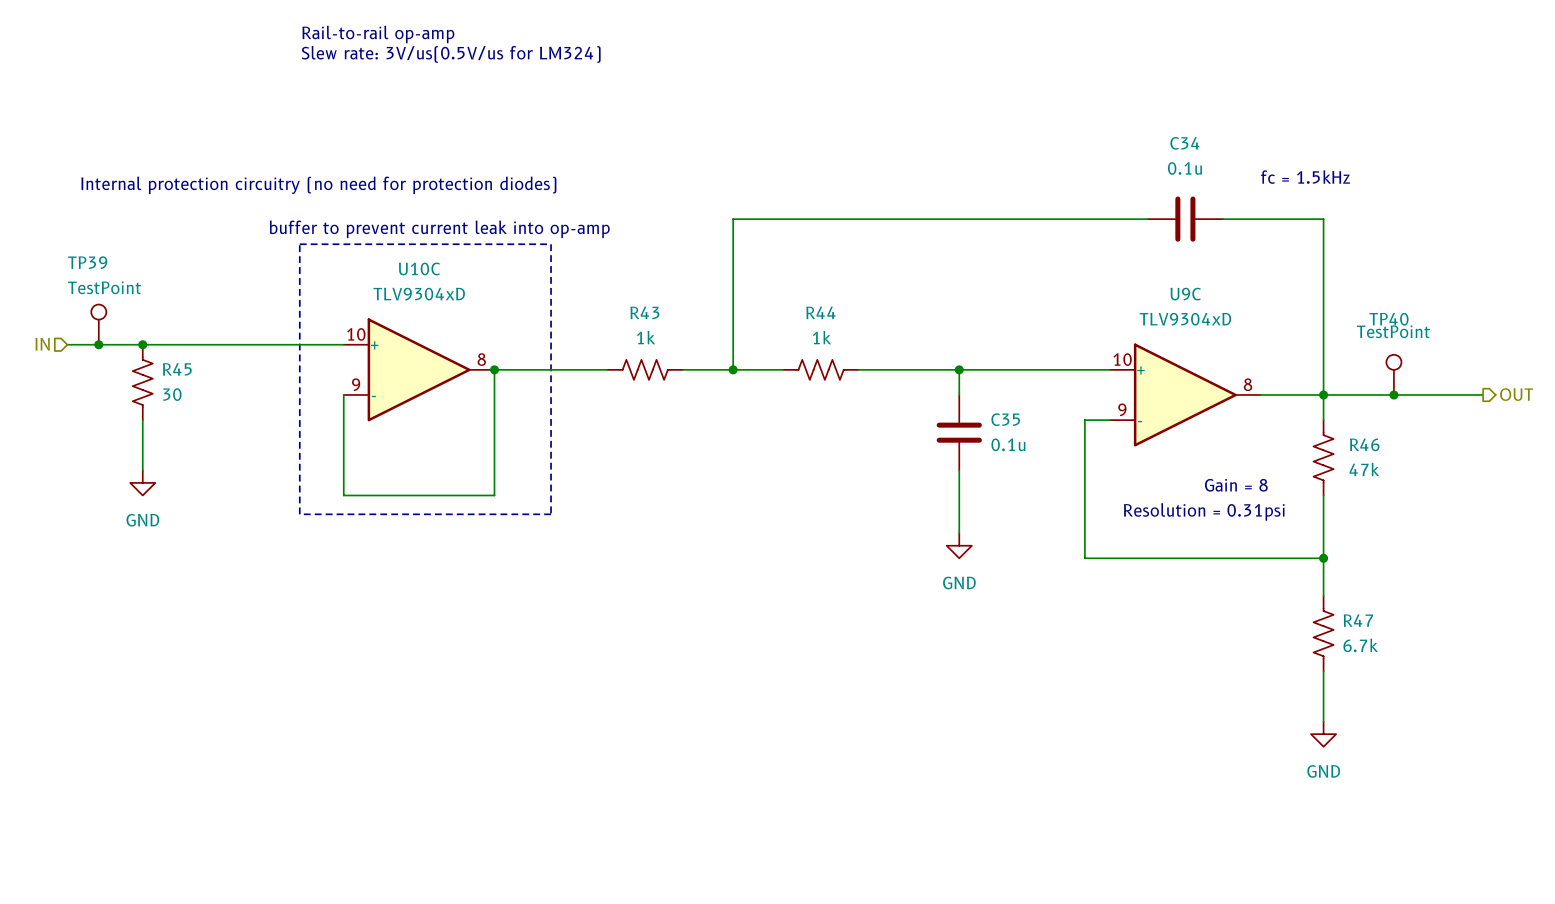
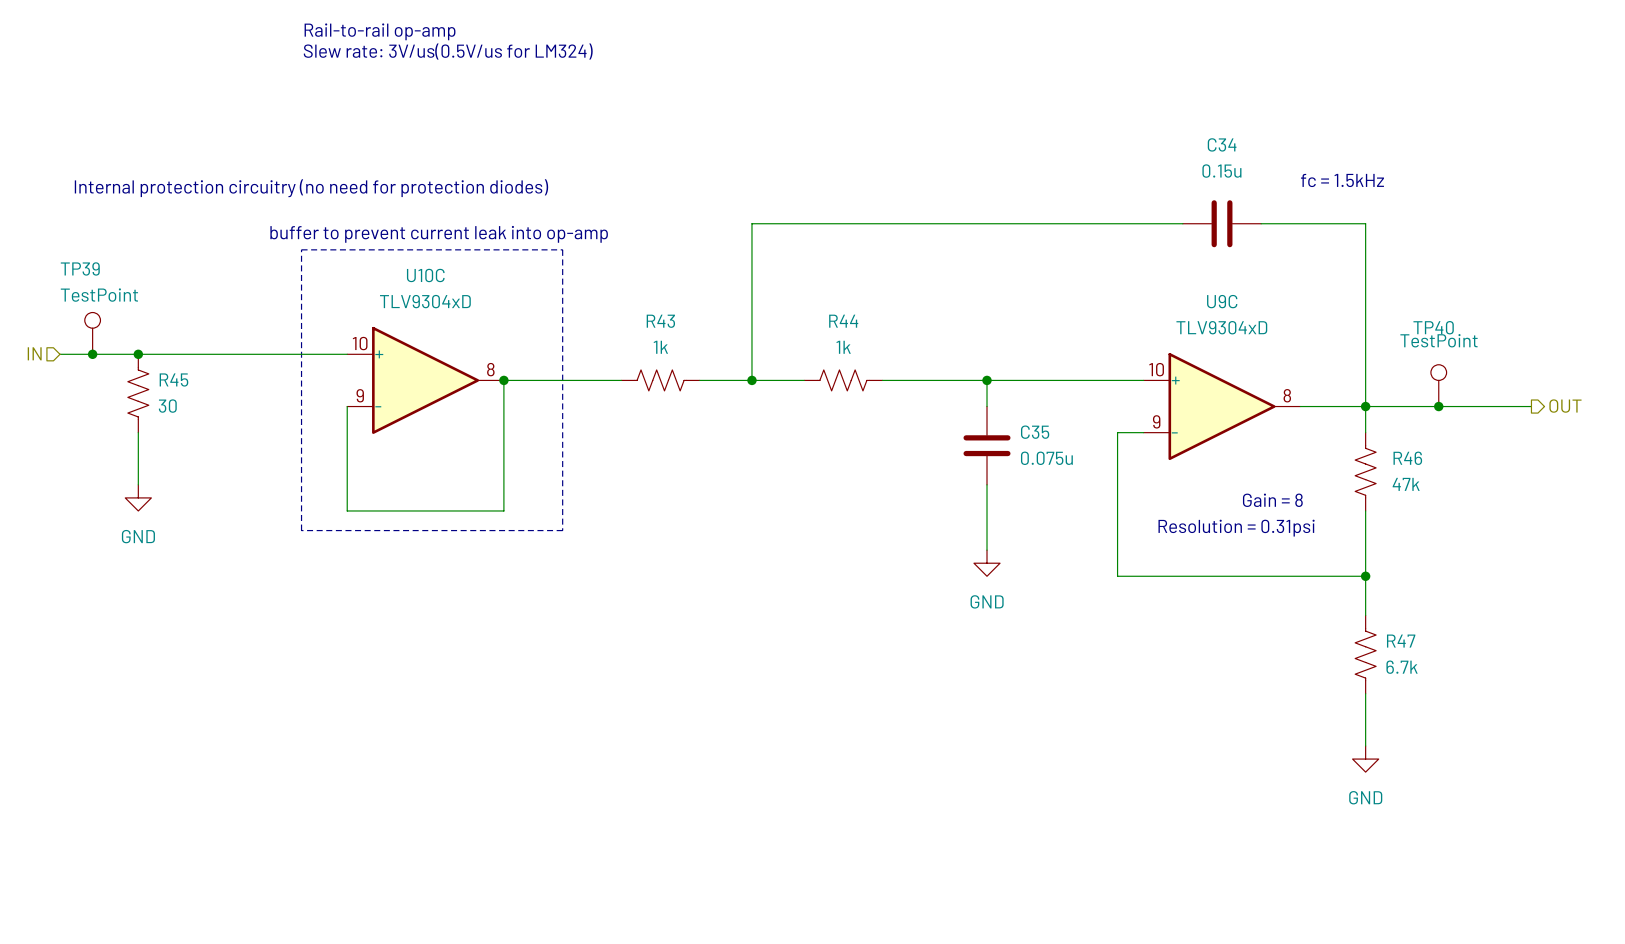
C34 value: 0.1u (1184, 168) -> 0.15u (1221, 171)
C35 value: 0.1u (1008, 444) -> 0.075u (1046, 458)

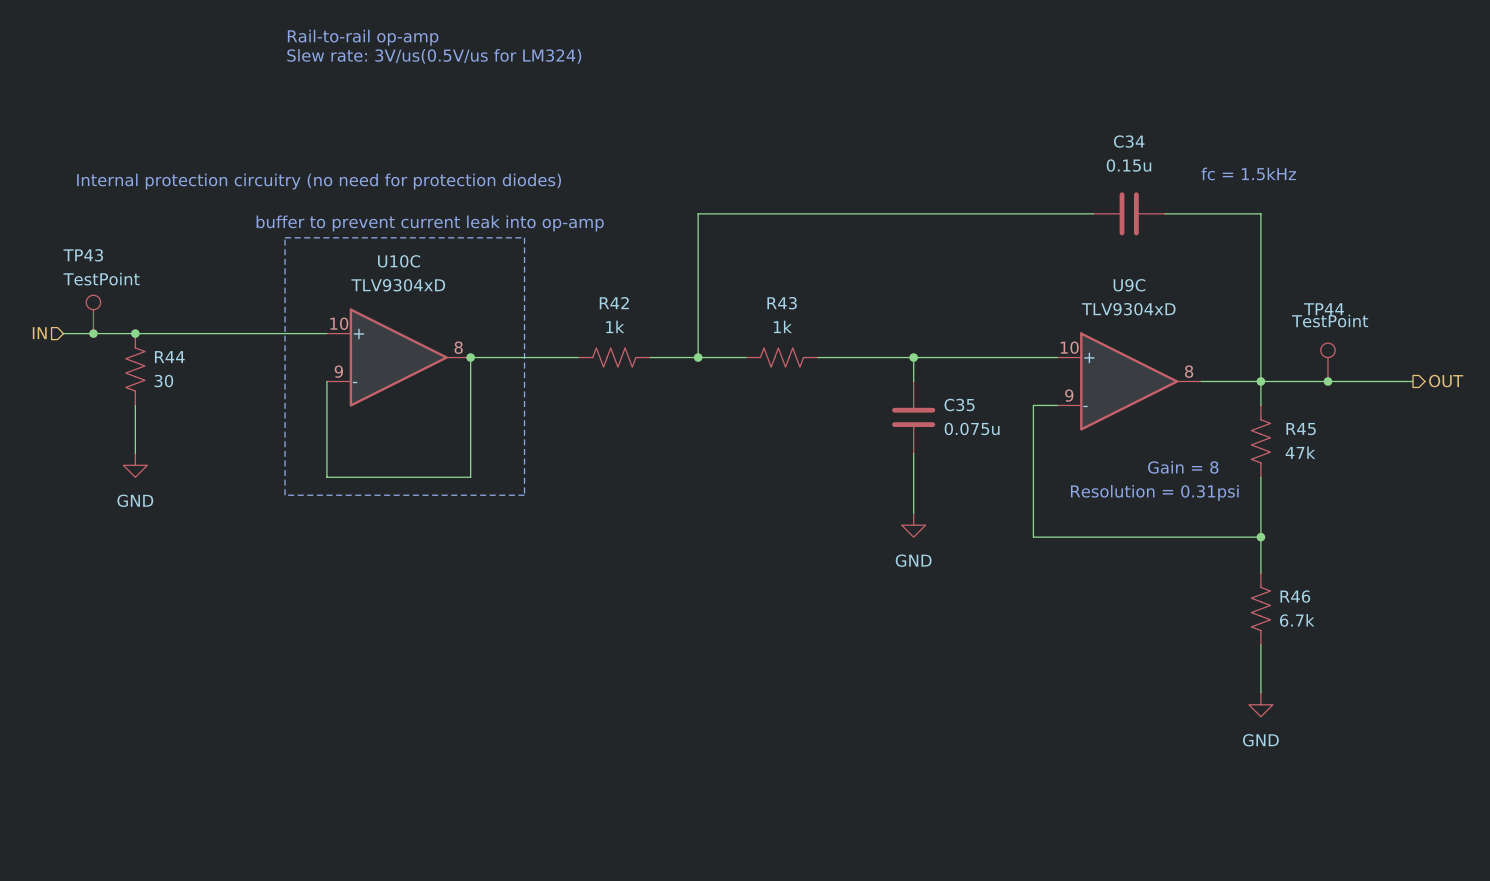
TP39 name: TP39 (80, 268) -> TP43 (83, 255)
R43 name: R43 (660, 321) -> R42 (614, 303)
R44 name: R44 (843, 321) -> R43 (782, 303)
TP40 name: TP40 (1433, 327) -> TP44 (1323, 309)
R45 name: R45 (173, 380) -> R44 (169, 357)
R46 name: R46 (1407, 458) -> R45 (1301, 429)
R47 name: R47 (1401, 641) -> R46 (1295, 596)

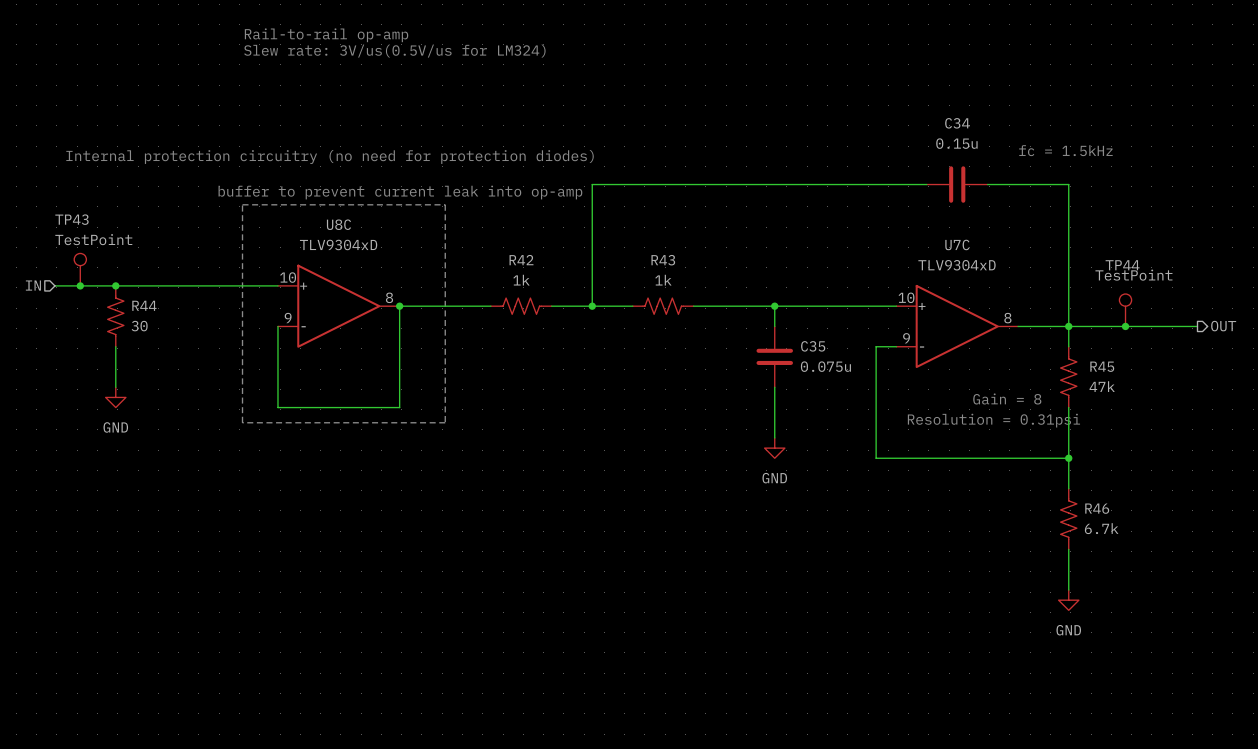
U10C name: U10C (399, 261) -> U8C (338, 224)
U9C name: U9C (1129, 285) -> U7C (957, 244)

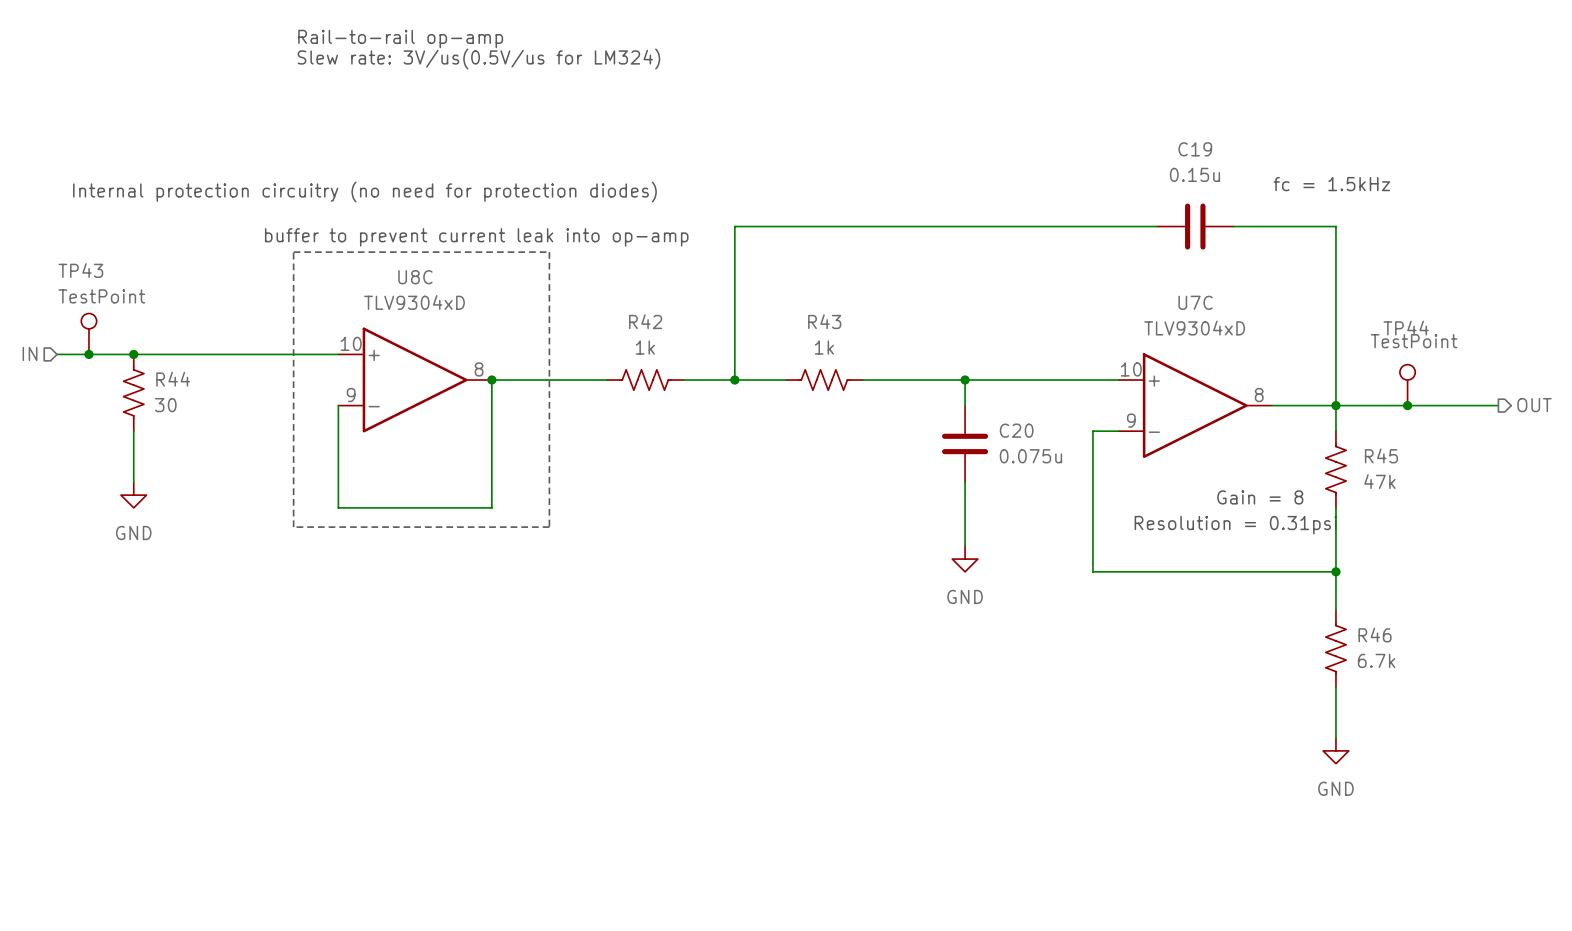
C34 name: C34 (957, 123) -> C19 (1195, 149)
C35 name: C35 (813, 346) -> C20 (1016, 430)

